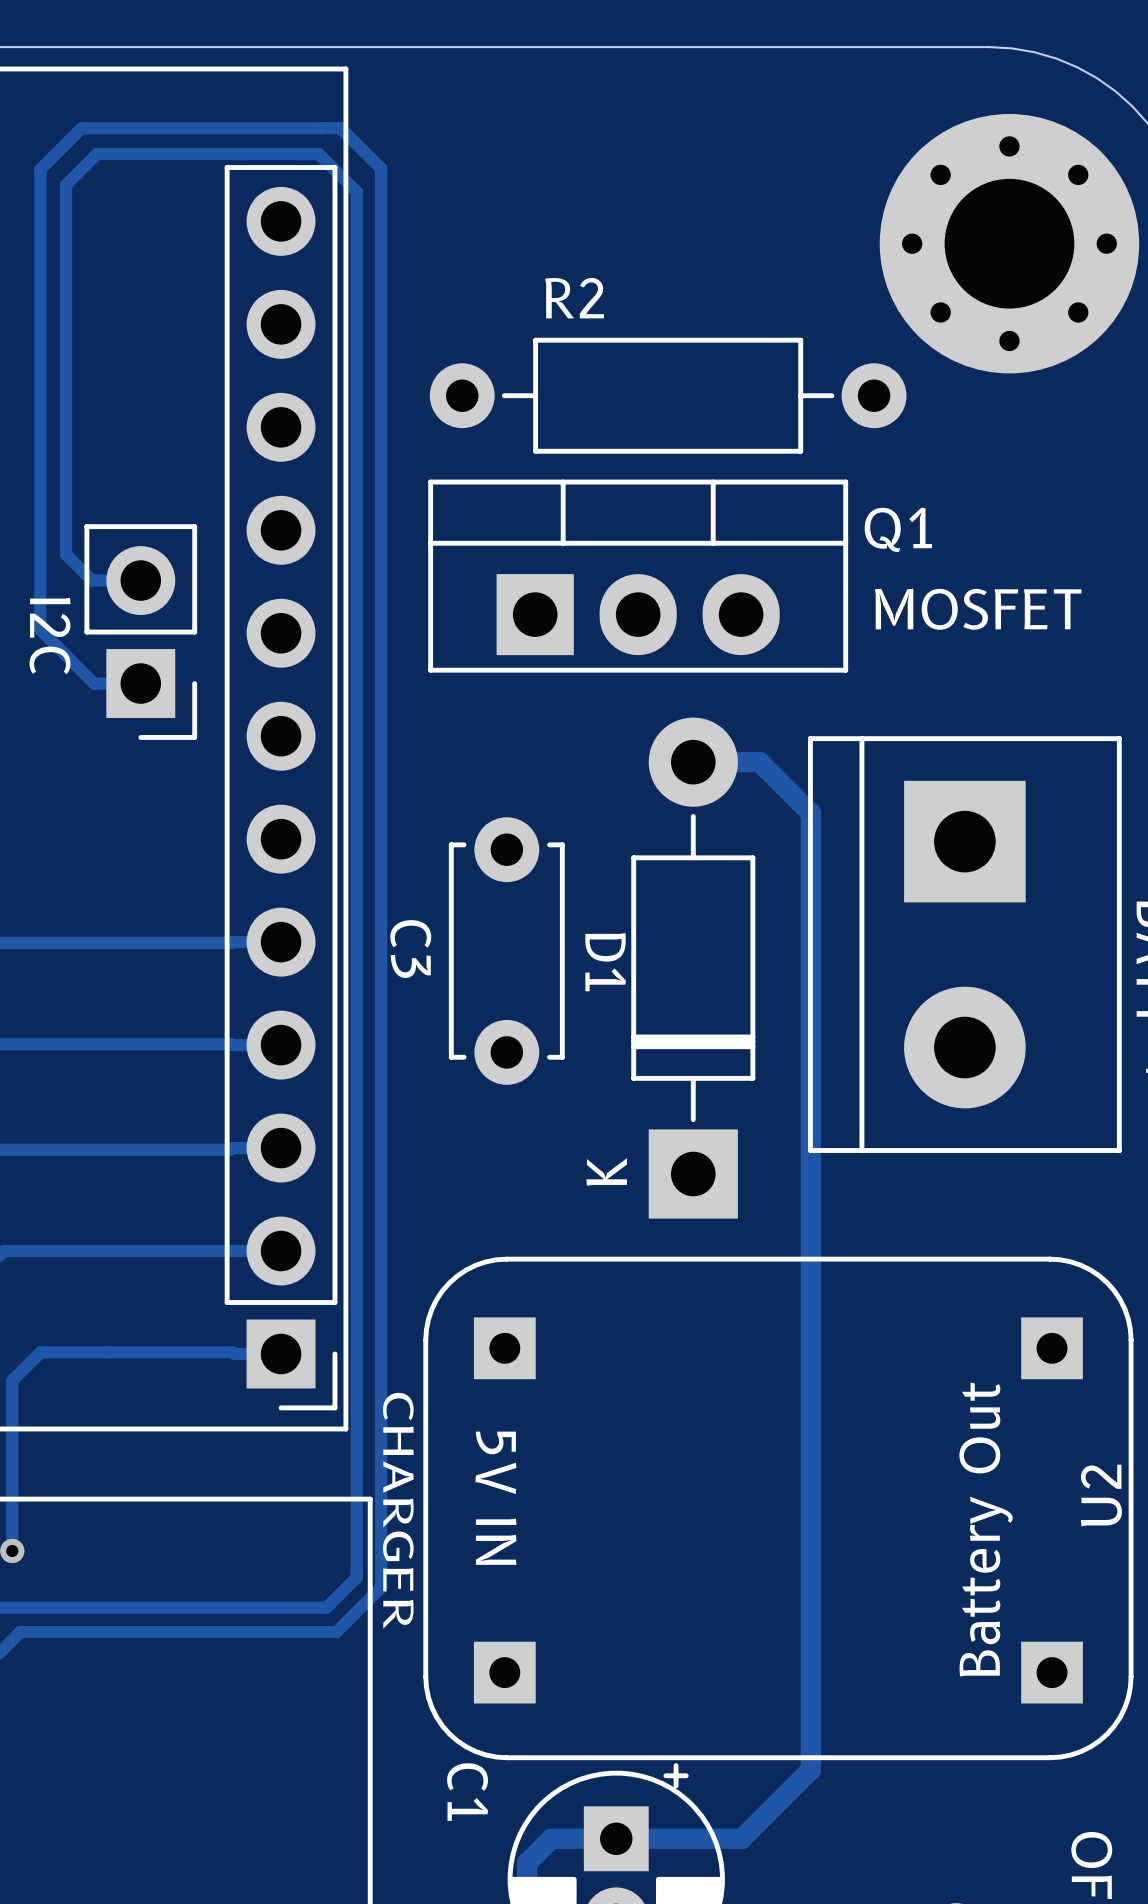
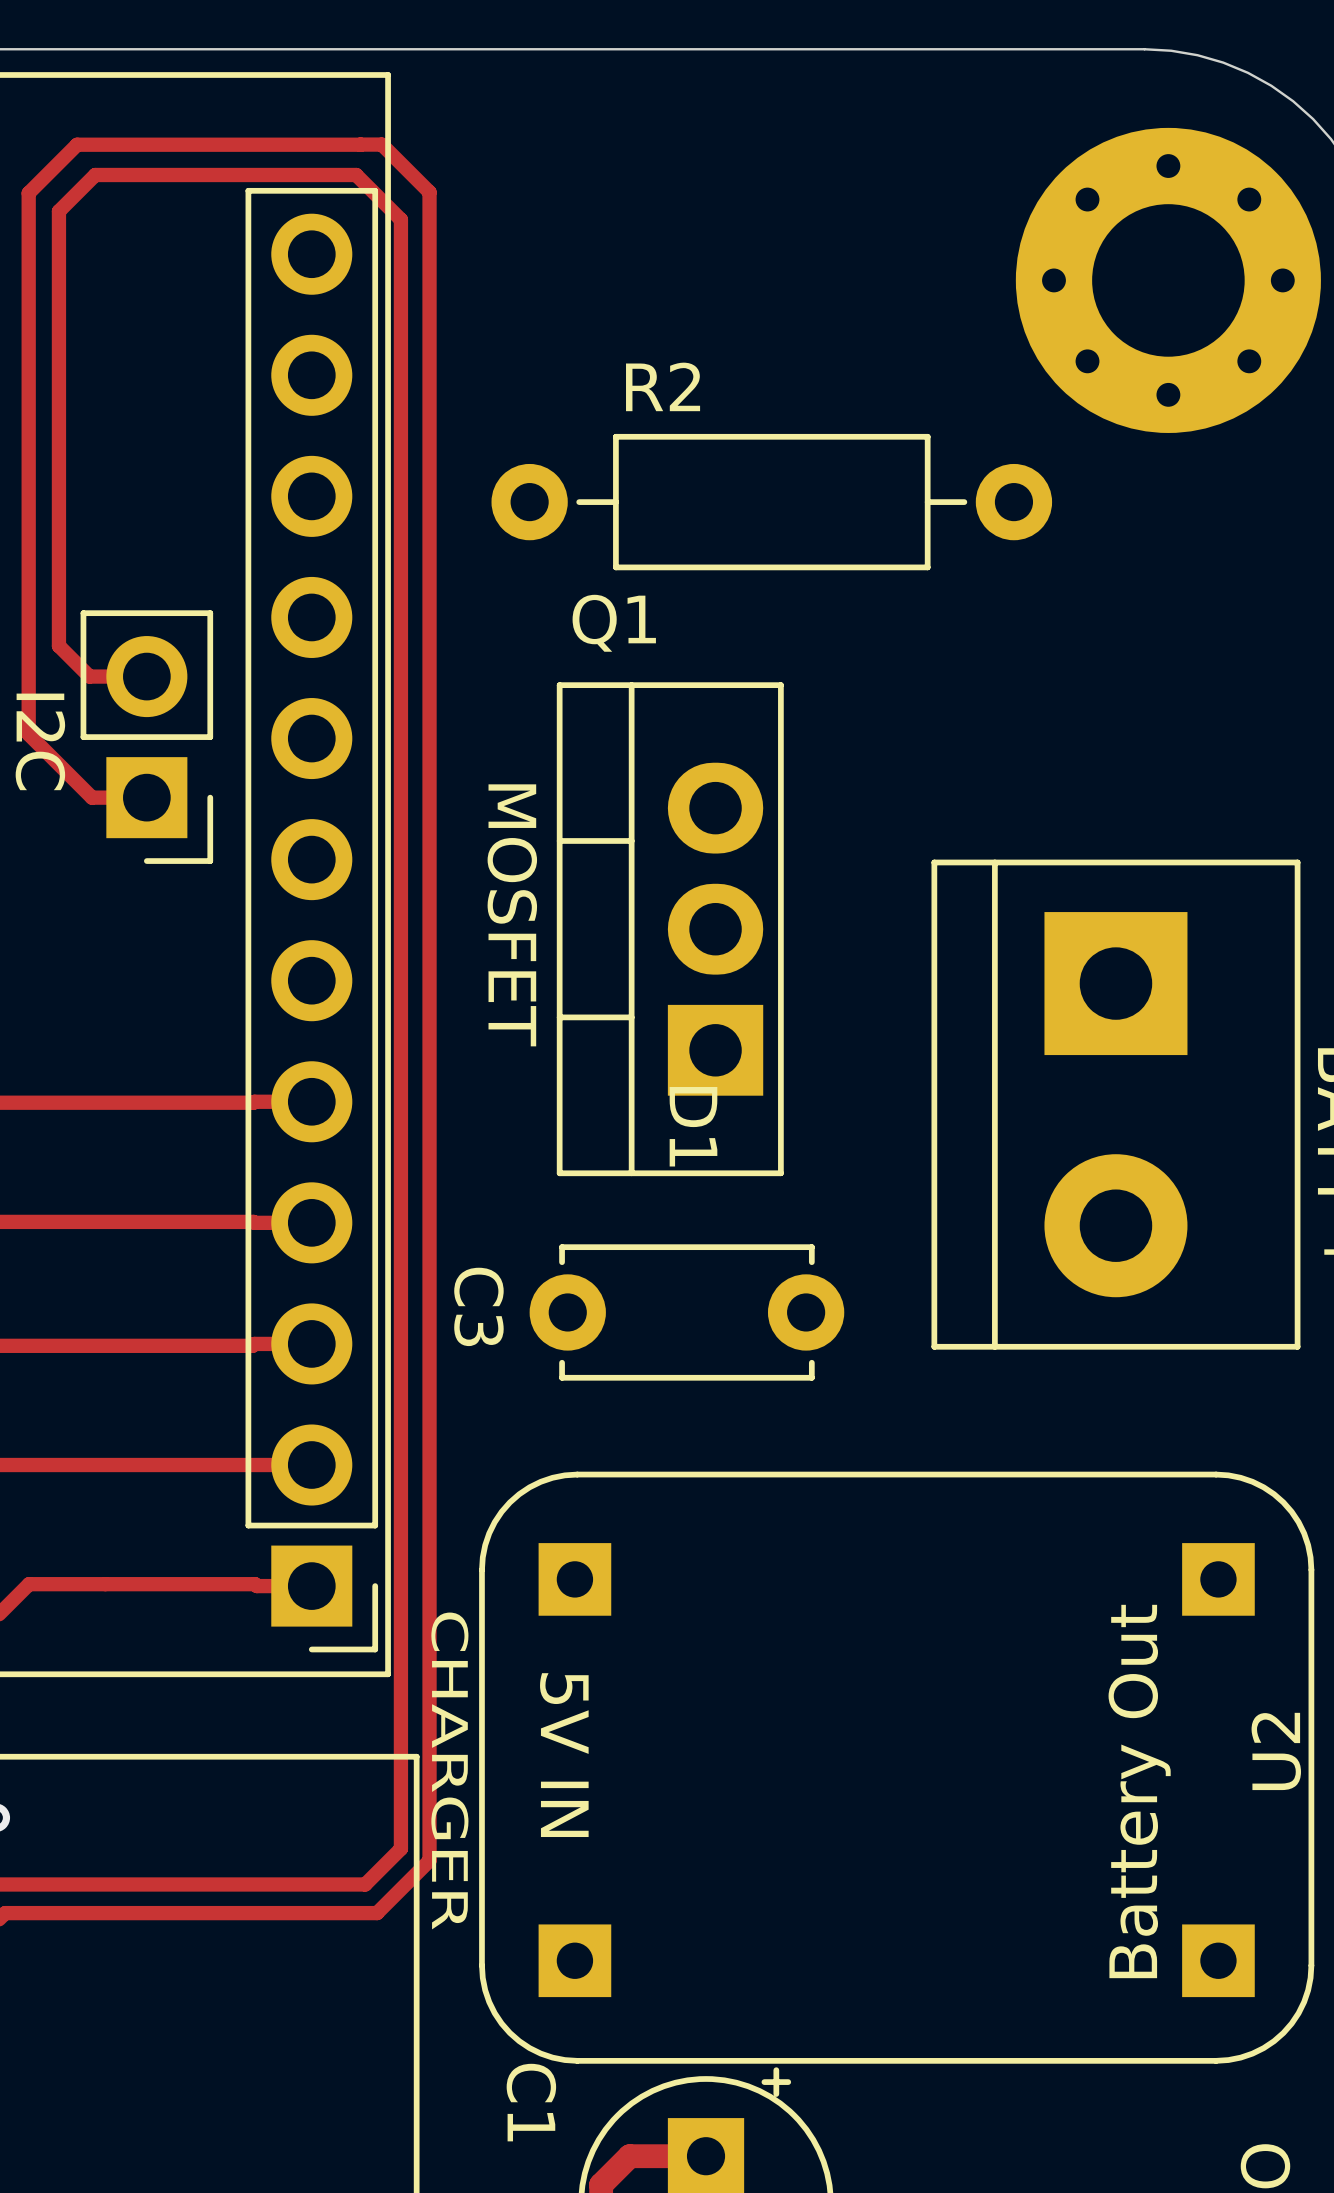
R2 position: (668, 395) -> (771, 502)
Q1 rotation: 0° (638, 576) -> 90° counterclockwise (670, 929)
text rotation: 0° (978, 609) -> 90° clockwise (512, 915)
text position: MOSFET (978, 609) -> MOSFET (512, 915)
track: (693, 762) (759, 762) (810, 813) (810, 1769) (741, 1838) (616, 1838) -> none
text position: C3 (410, 949) -> C3 (478, 1306)
part rotation: 0° (506, 951) -> 90° clockwise (686, 1312)
part position: (506, 951) -> (686, 1312)
part: (693, 968) -> none

